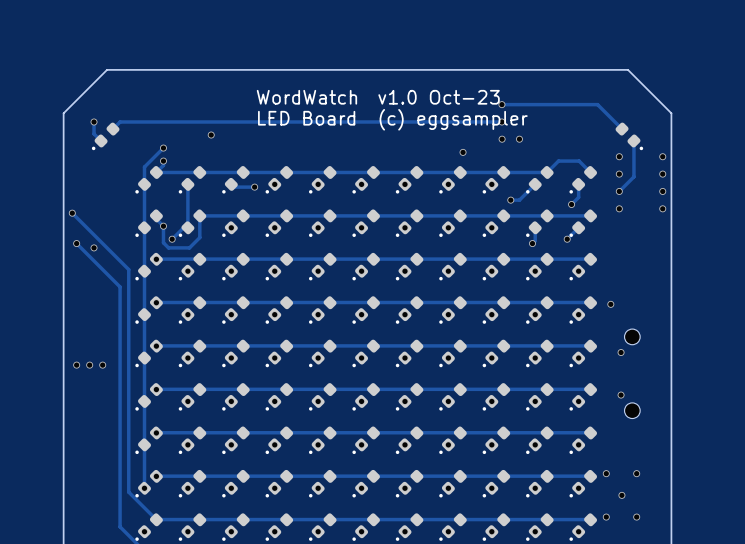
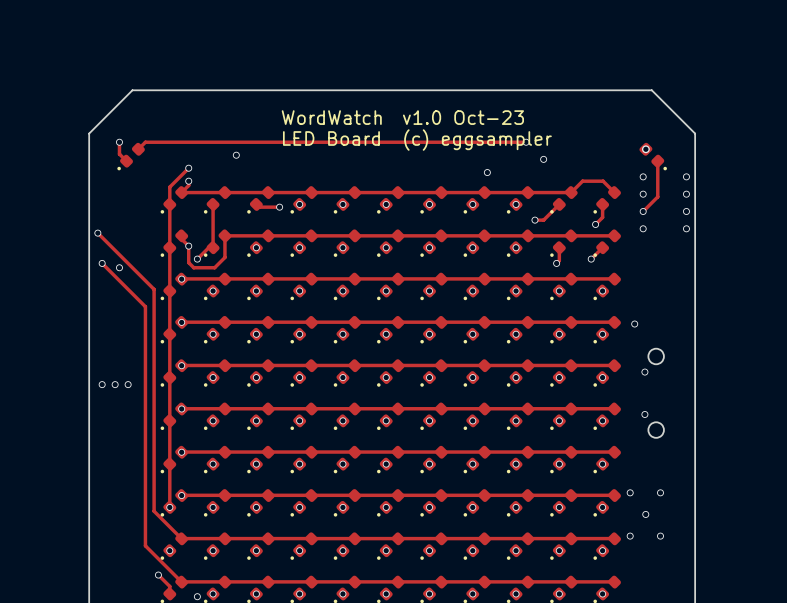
track: (501, 104) (597, 104) (622, 129) -> none
via: (501, 104) -> none
via: none -> (645, 149)
via: (502, 139) -> none

